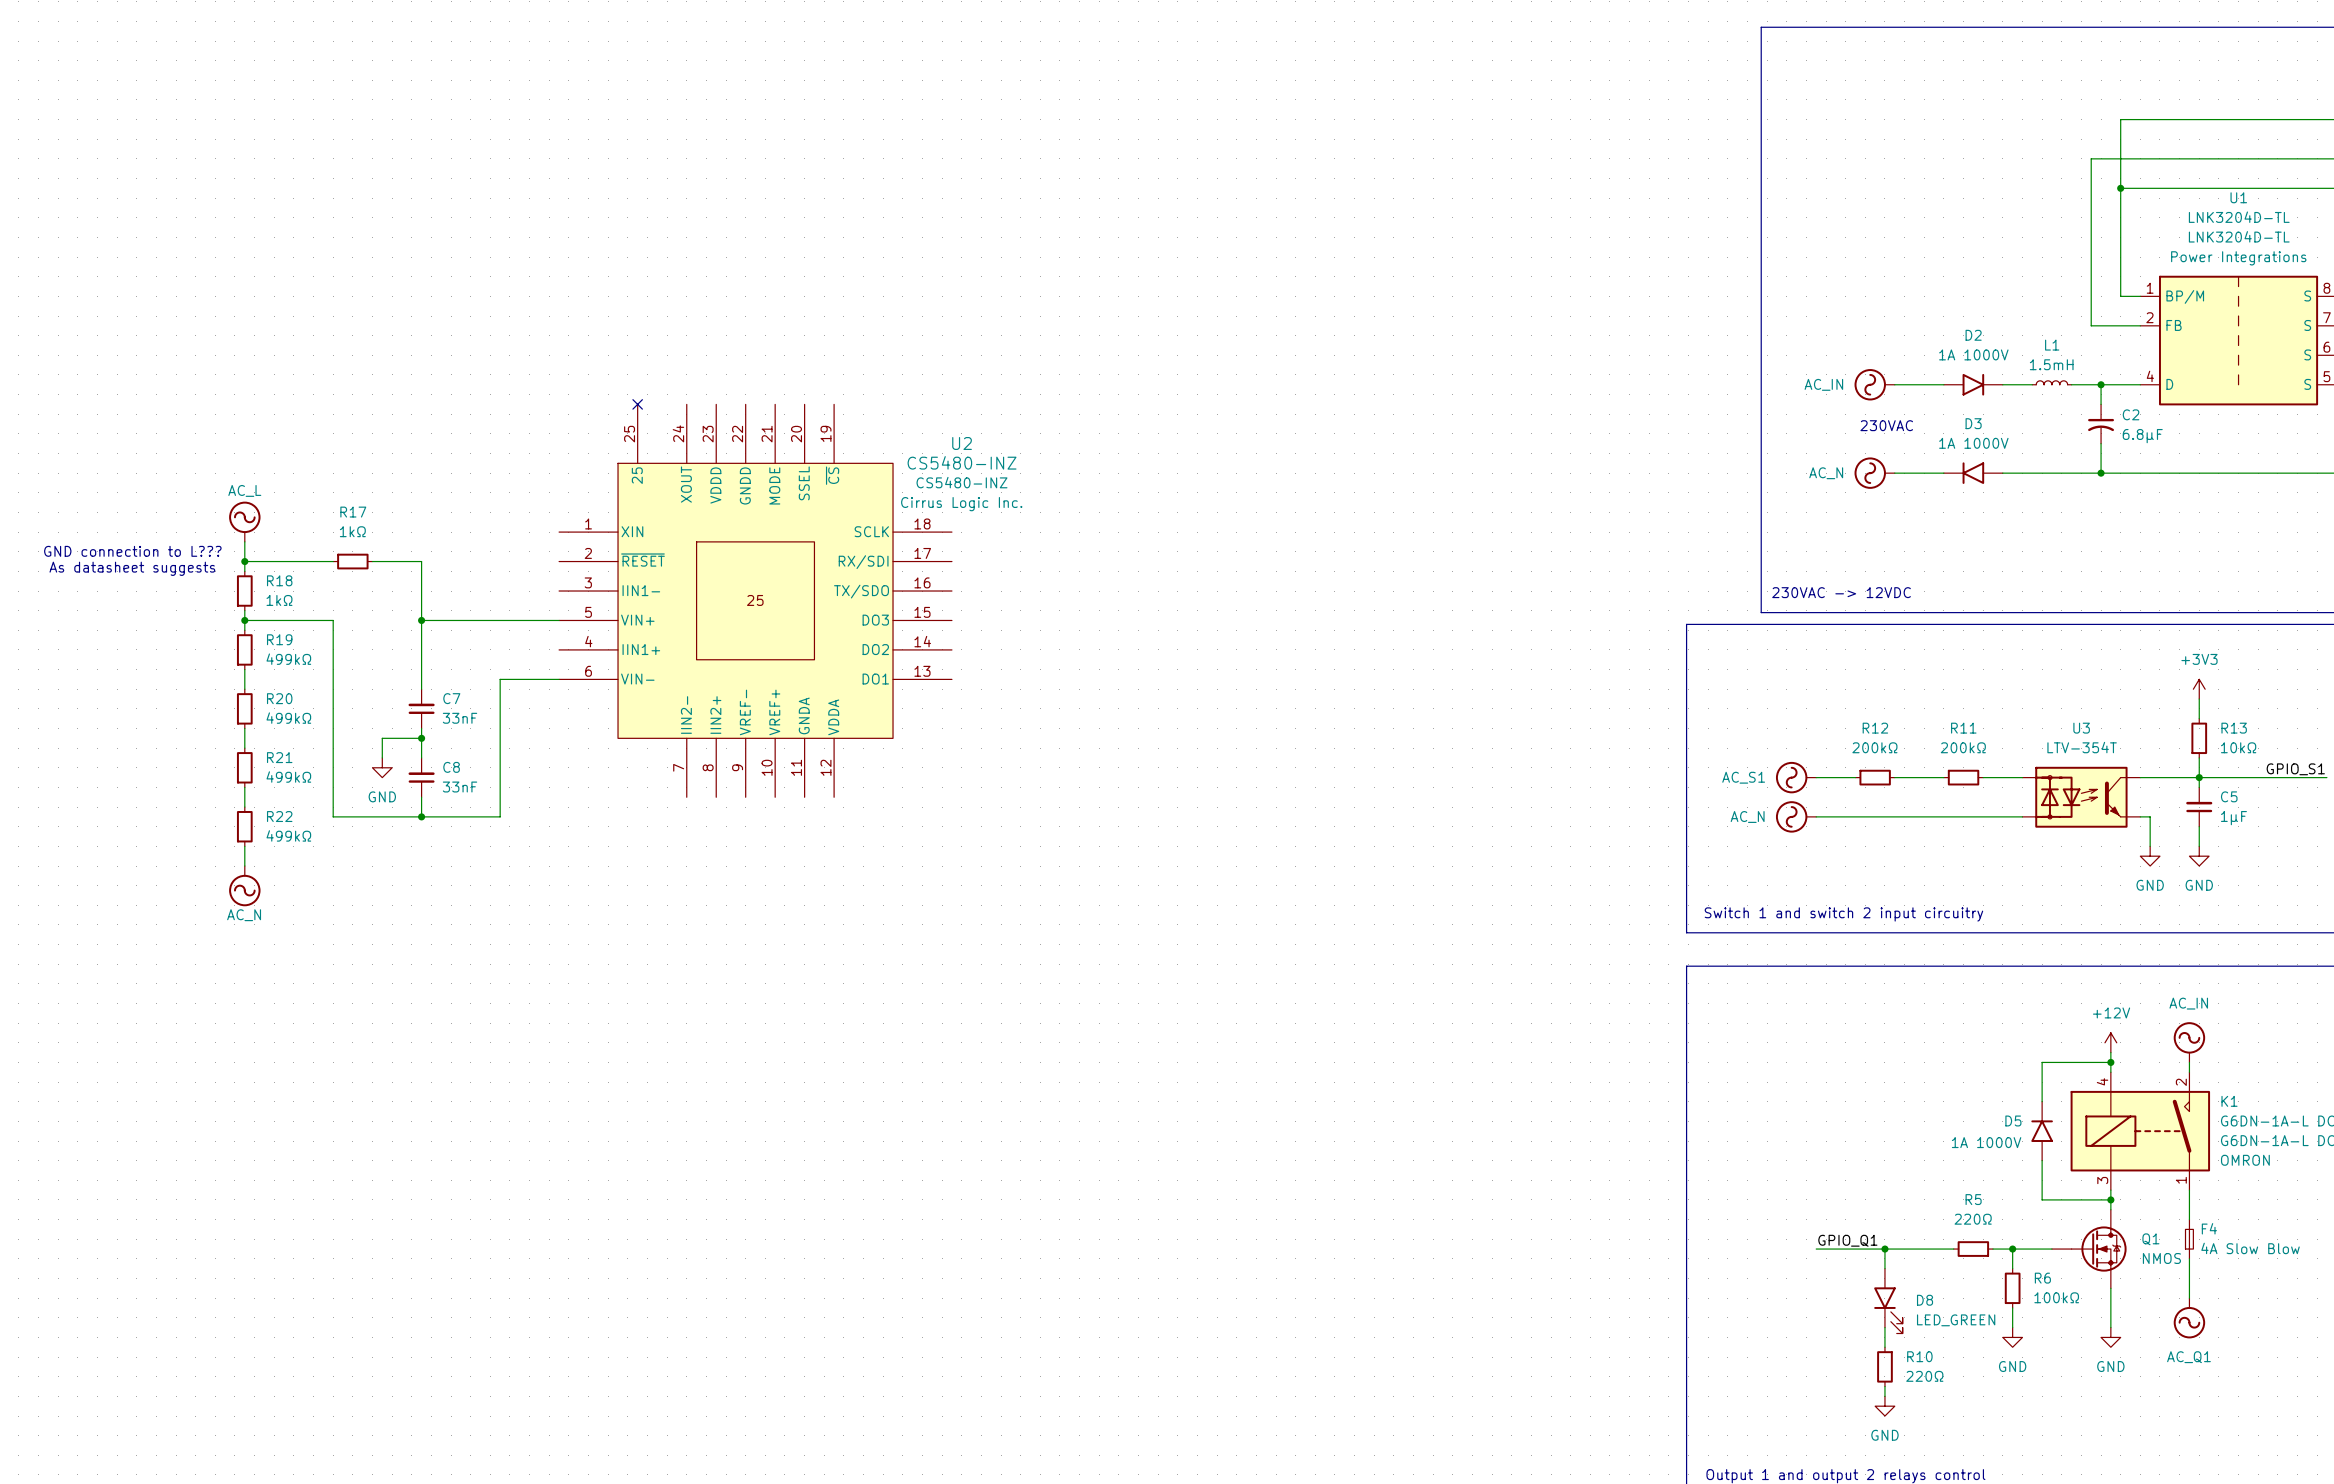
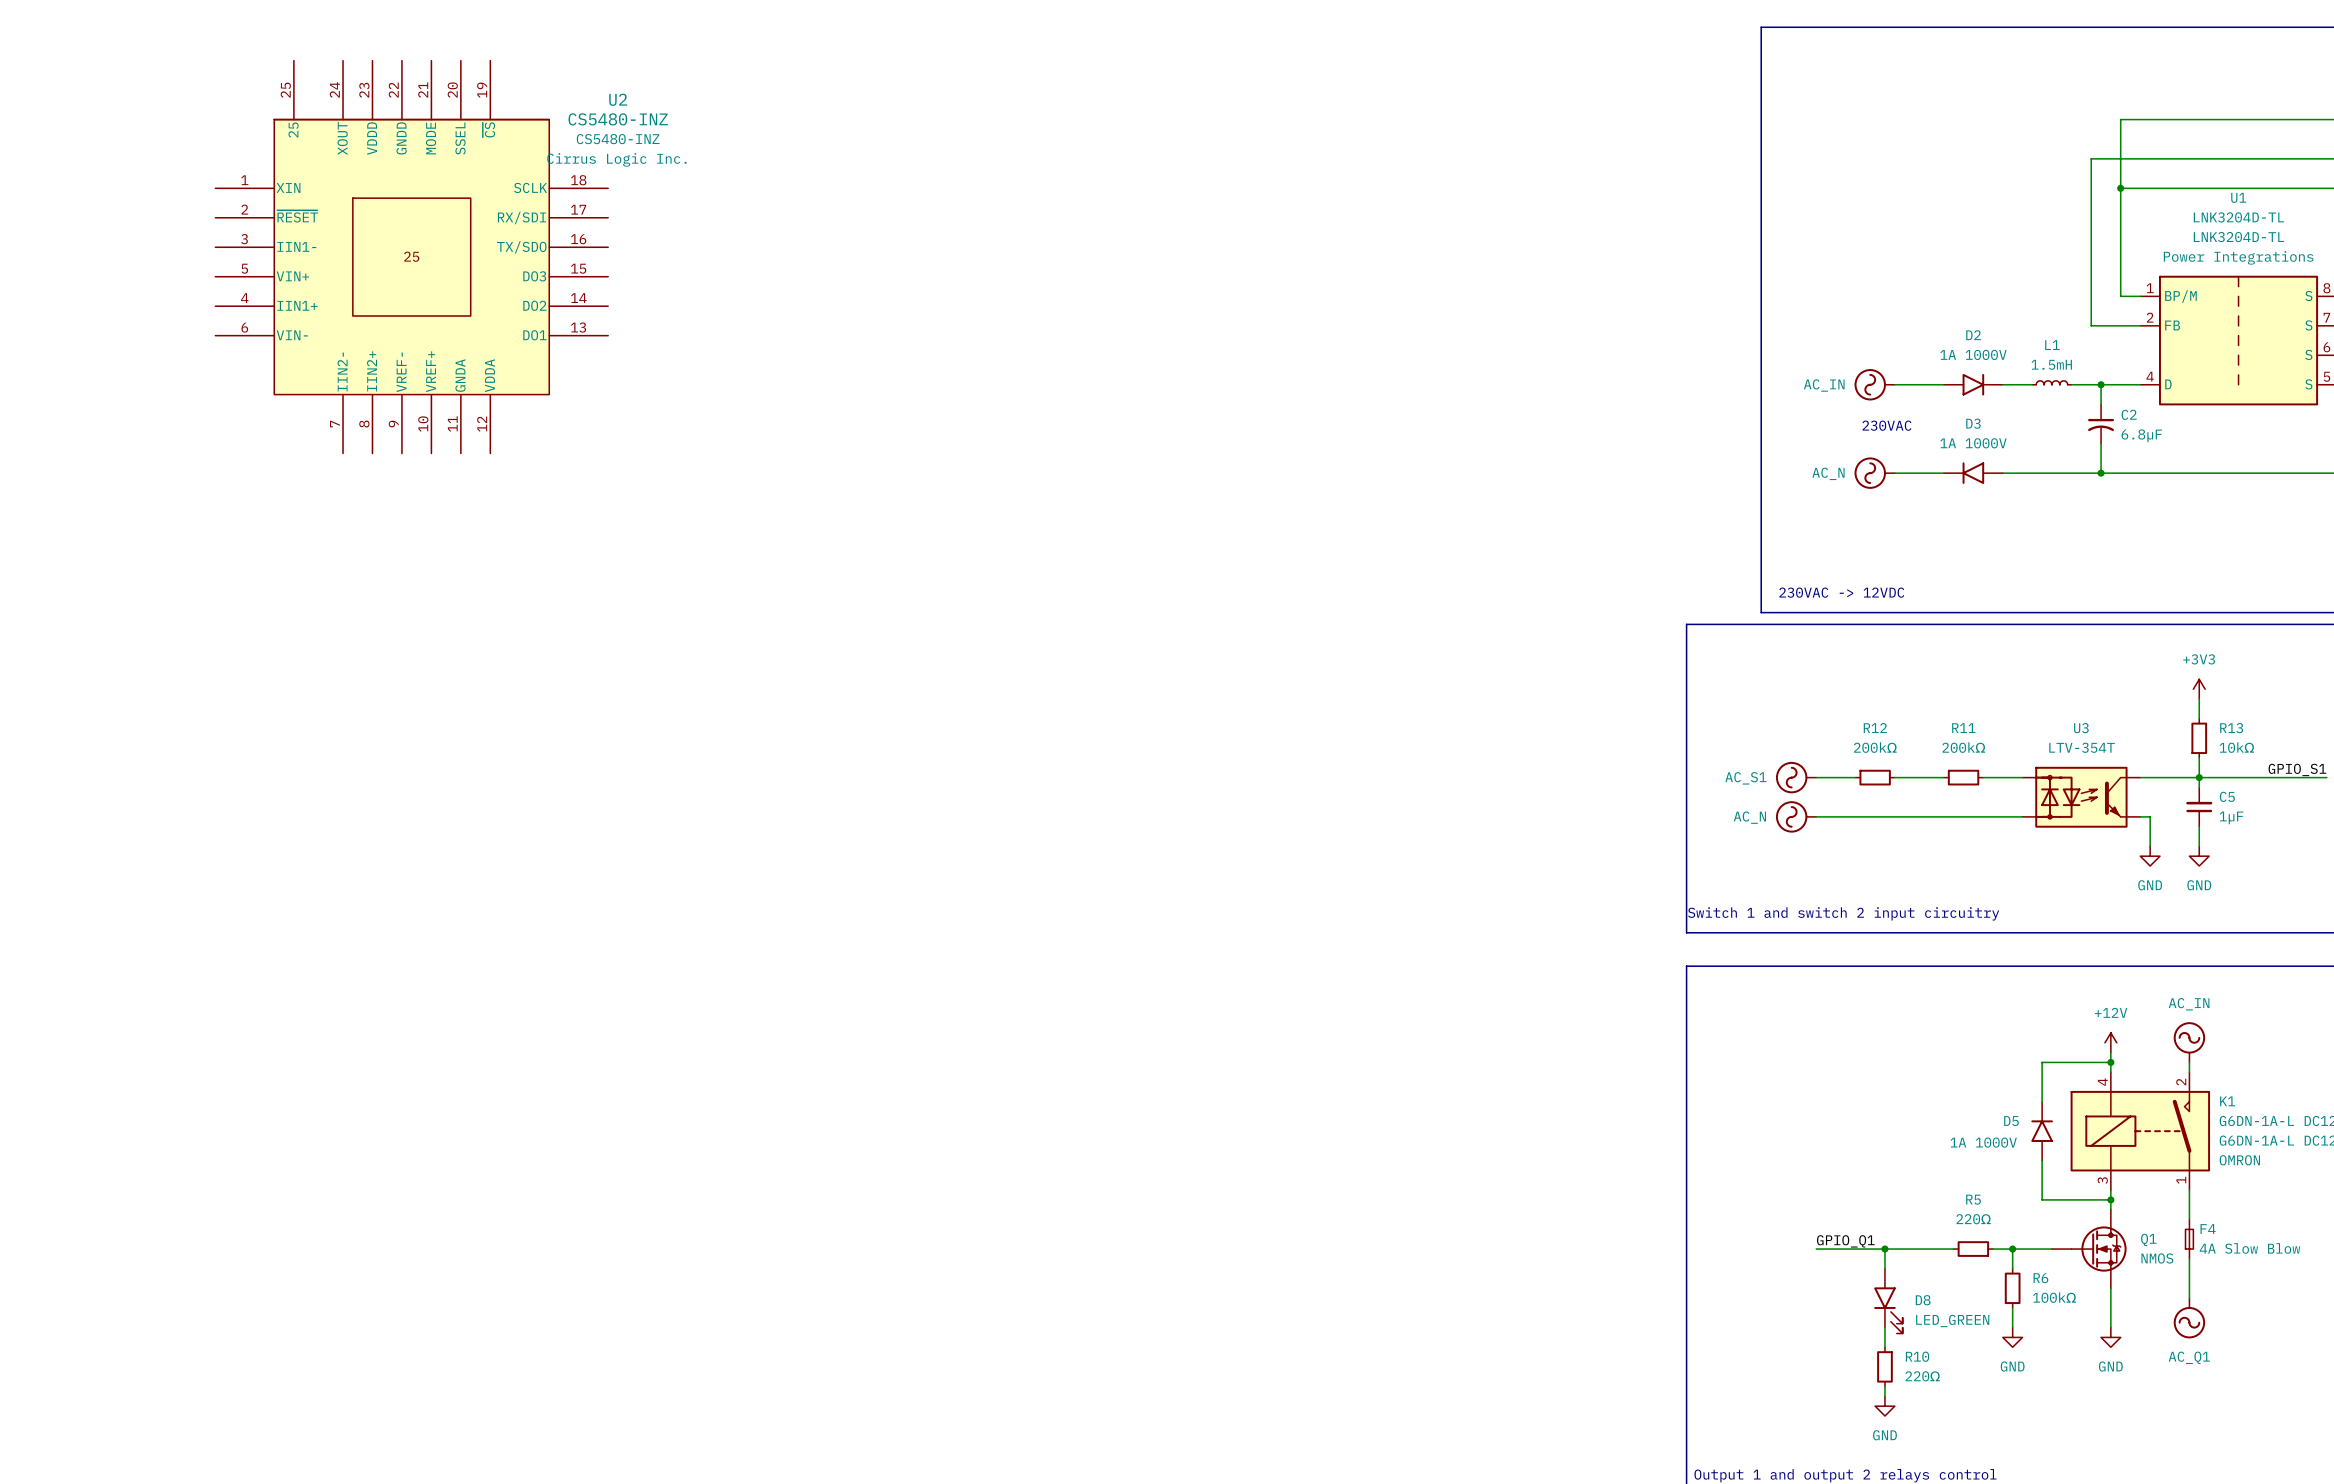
U2 symbol: [559, 404, 952, 798] -> [215, 60, 609, 454]
no-connect mark: (637, 404) -> none
power symbol: AC_L (244, 521) -> none
wire: (244, 541) (244, 571) -> none
text: GND connection to L??? (132, 551) -> none
wire: (244, 561) (333, 561) -> none
junction: (244, 561) -> none
R17: (352, 561) -> none
wire: (372, 561) (421, 561) (421, 689) -> none
text: As datasheet suggests (132, 568) -> none
R18: (244, 591) -> none
wire: (244, 610) (244, 630) -> none
wire: (244, 620) (333, 620) (333, 816) (500, 816) (500, 679) (559, 679) -> none
junction: (244, 620) -> none
wire: (421, 620) (559, 620) -> none
junction: (421, 620) -> none
R19: (244, 649) -> none
wire: (244, 669) (244, 689) -> none
R20: (244, 708) -> none
C7: (421, 708) -> none
wire: (244, 728) (244, 748) -> none
wire: (421, 728) (421, 757) -> none
wire: (421, 738) (382, 738) (382, 757) -> none
junction: (421, 738) -> none
R21: (244, 767) -> none
power symbol: GND (382, 767) -> none
C8: (421, 777) -> none
wire: (244, 787) (244, 807) -> none
wire: (421, 797) (421, 816) -> none
junction: (421, 816) -> none
R22: (244, 826) -> none
wire: (244, 846) (244, 866) -> none
power symbol: AC_N (244, 886) -> none

